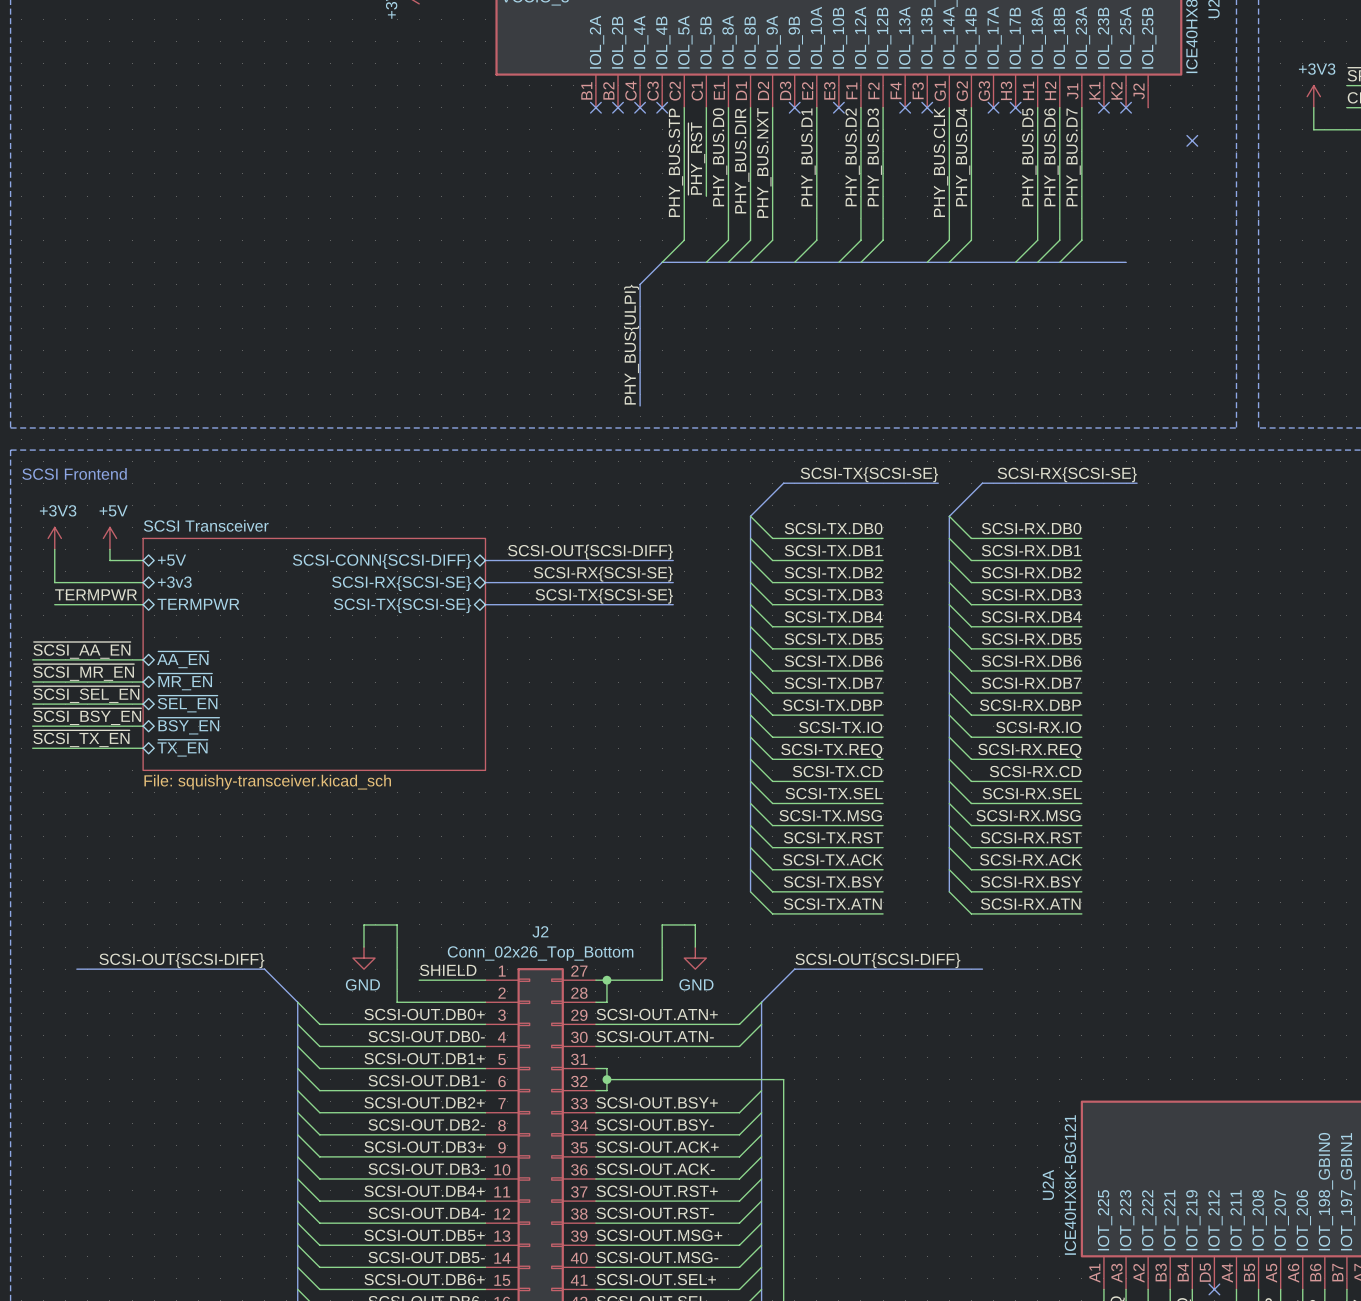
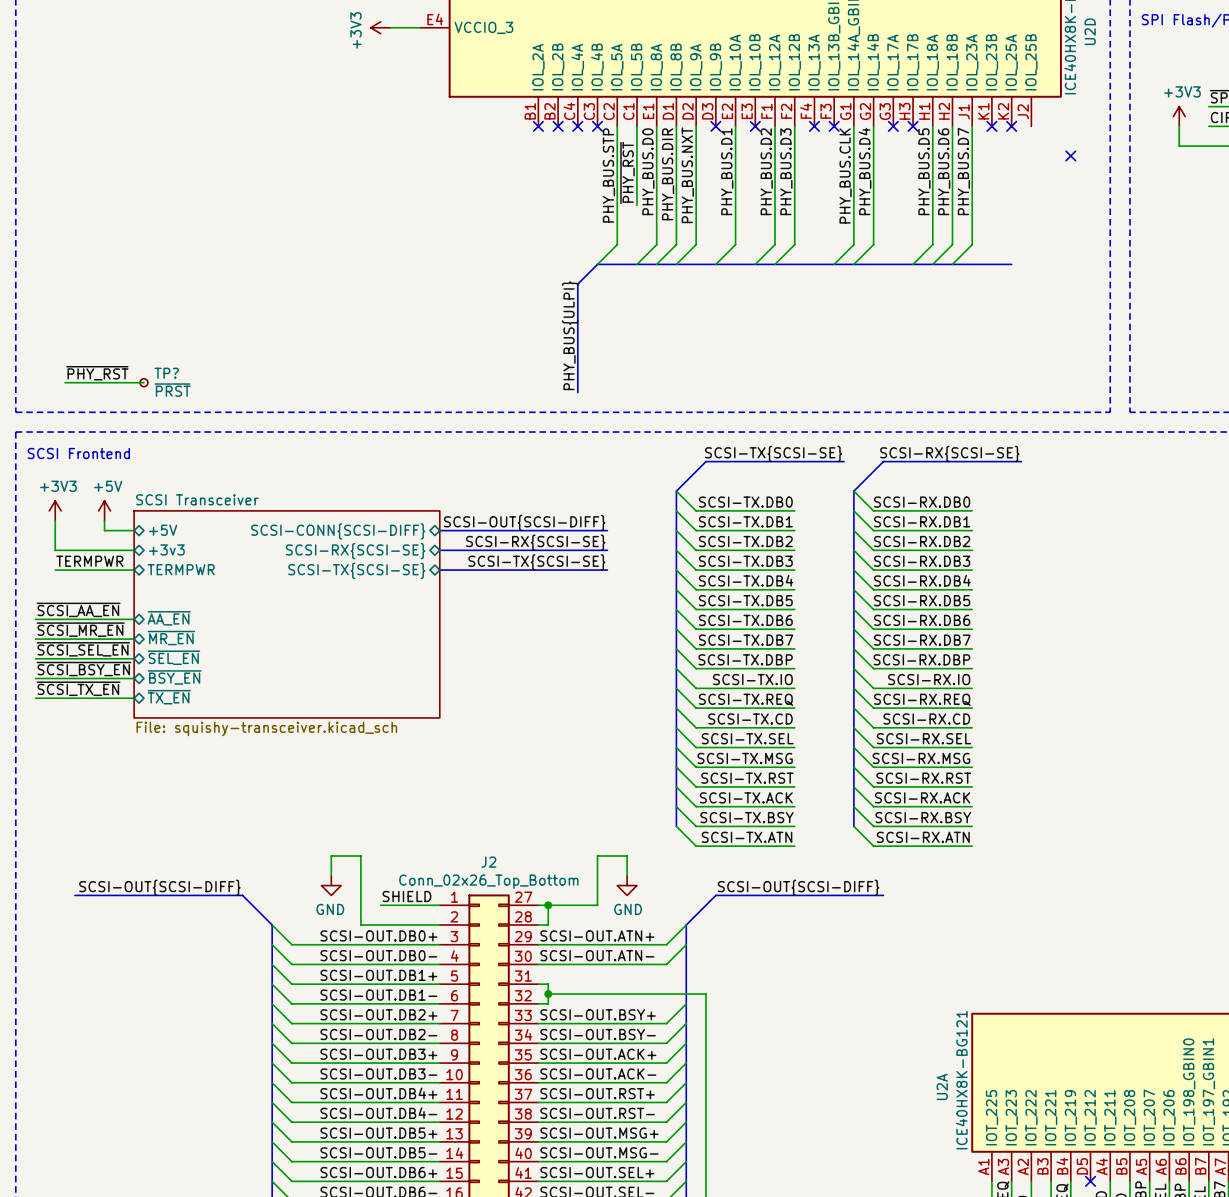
label: none -> ~{PHY_RST} (97, 373)
wire: none -> (65, 382) (143, 382)
TP?: none -> ~{PRST} (143, 382)

